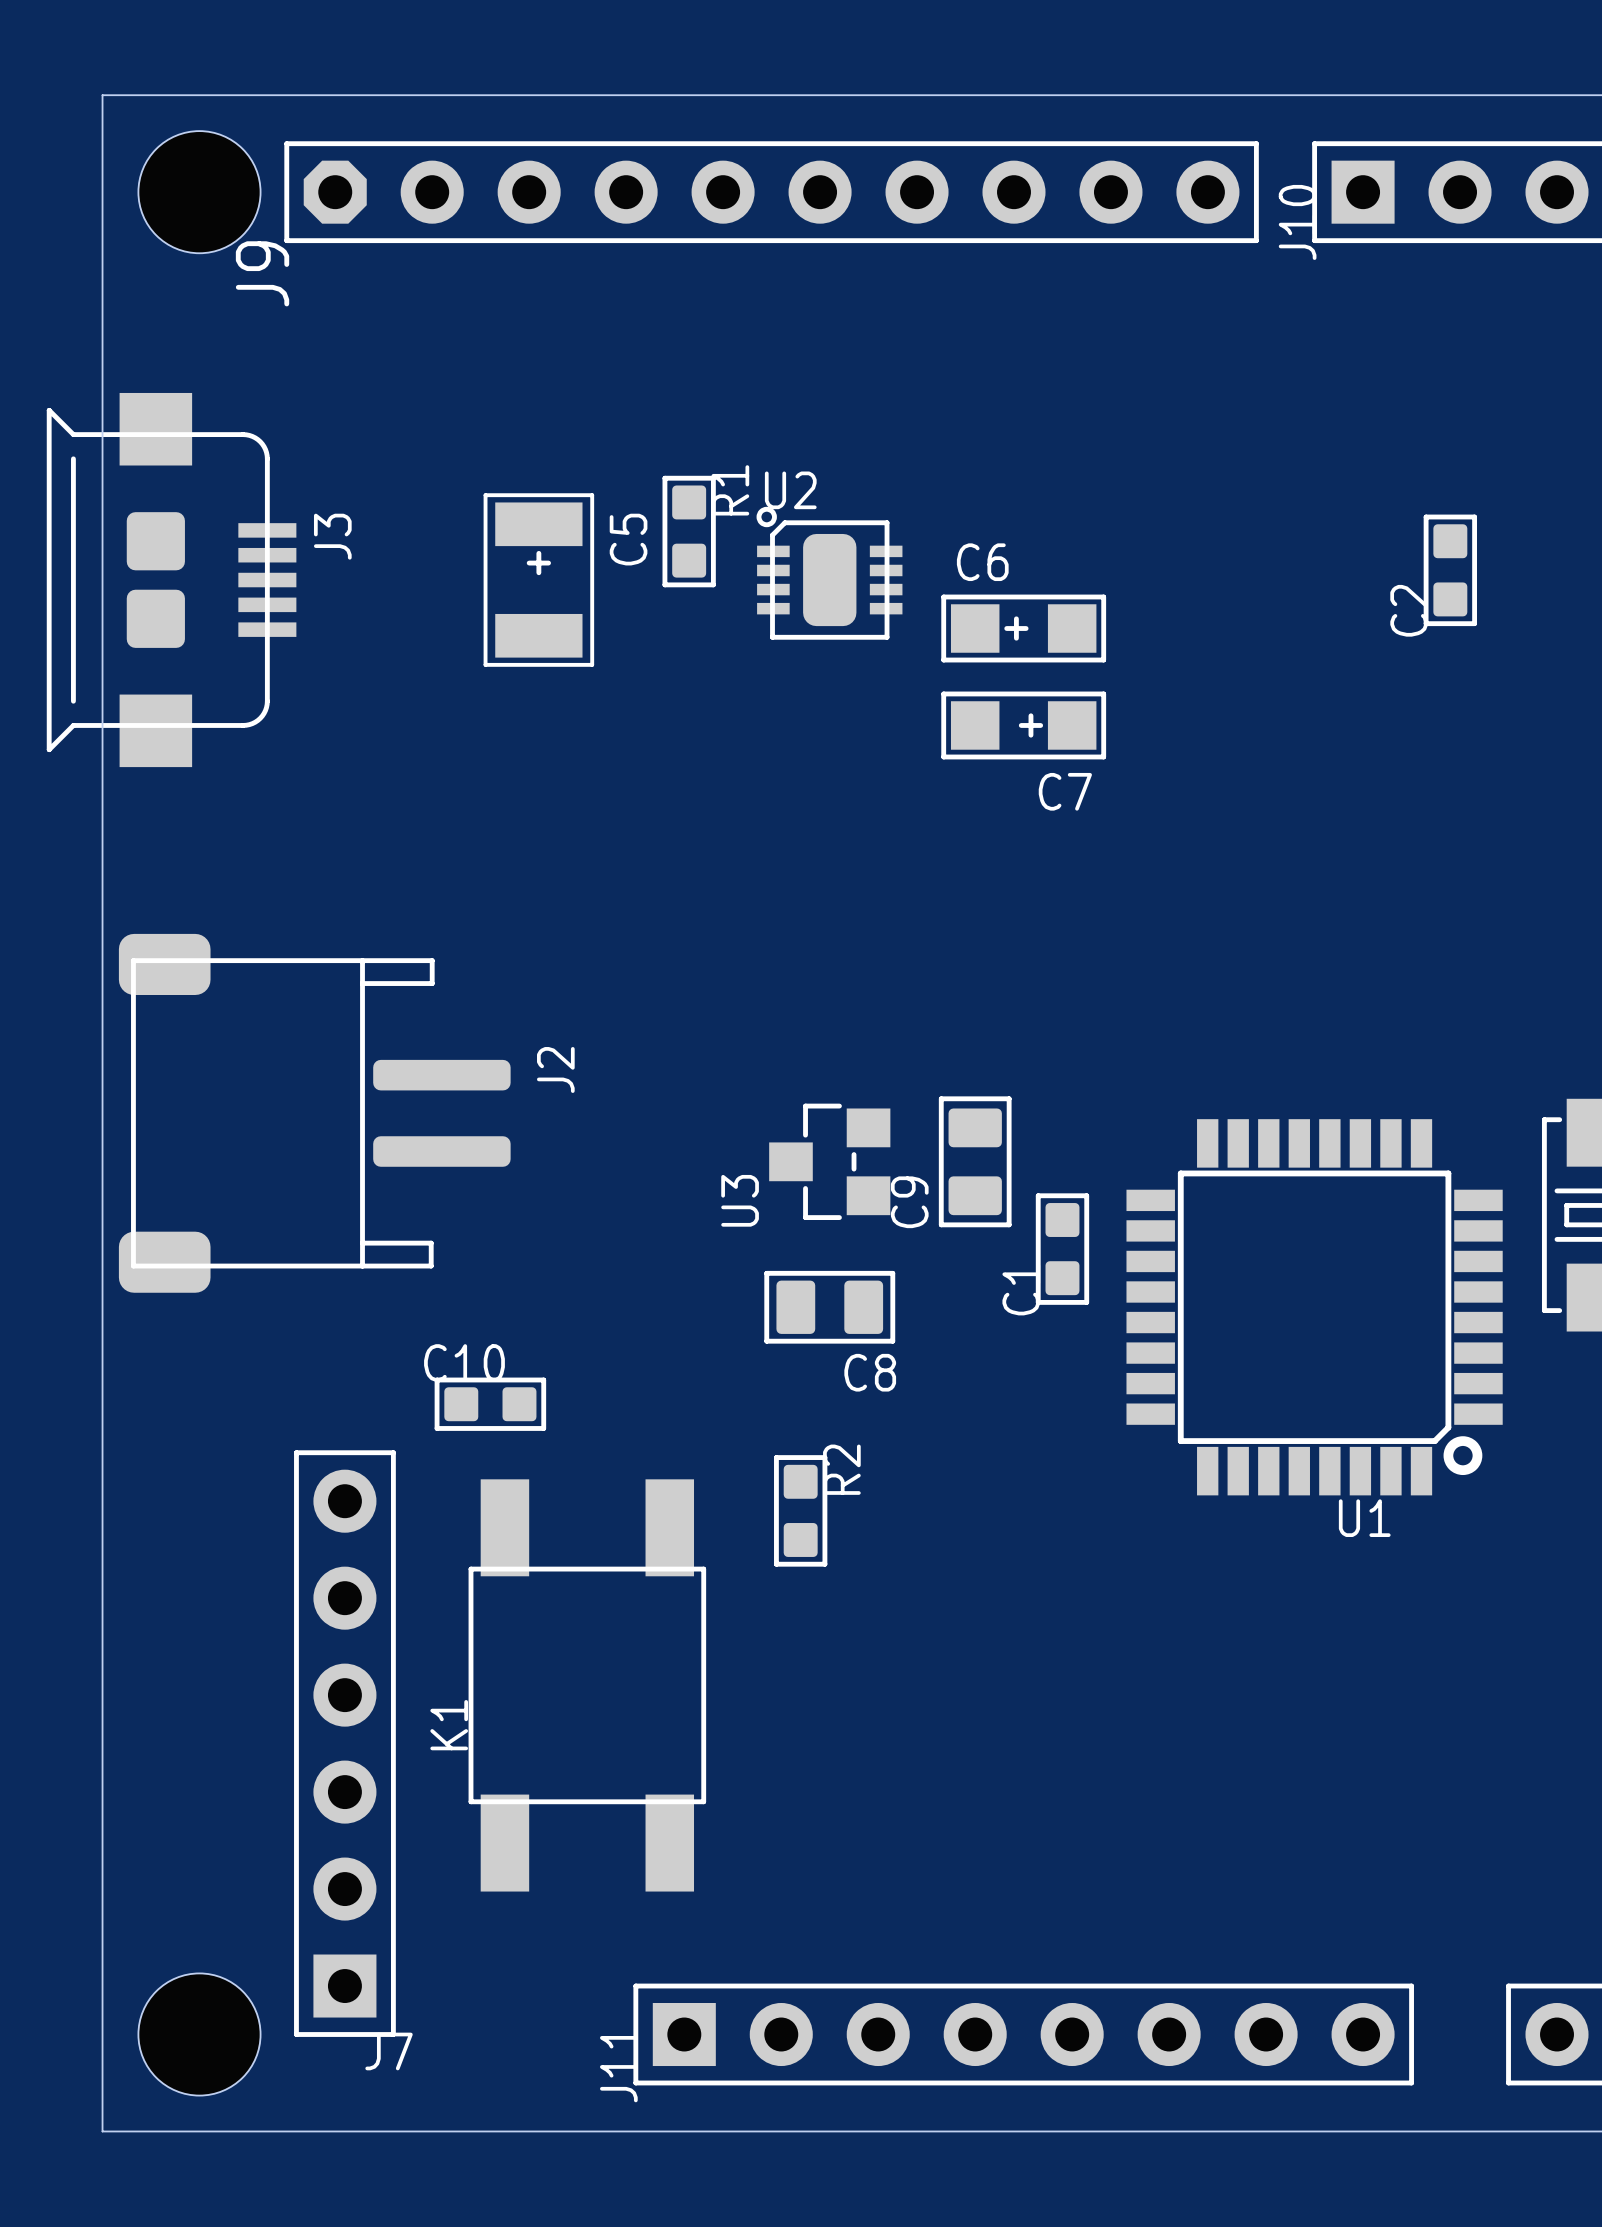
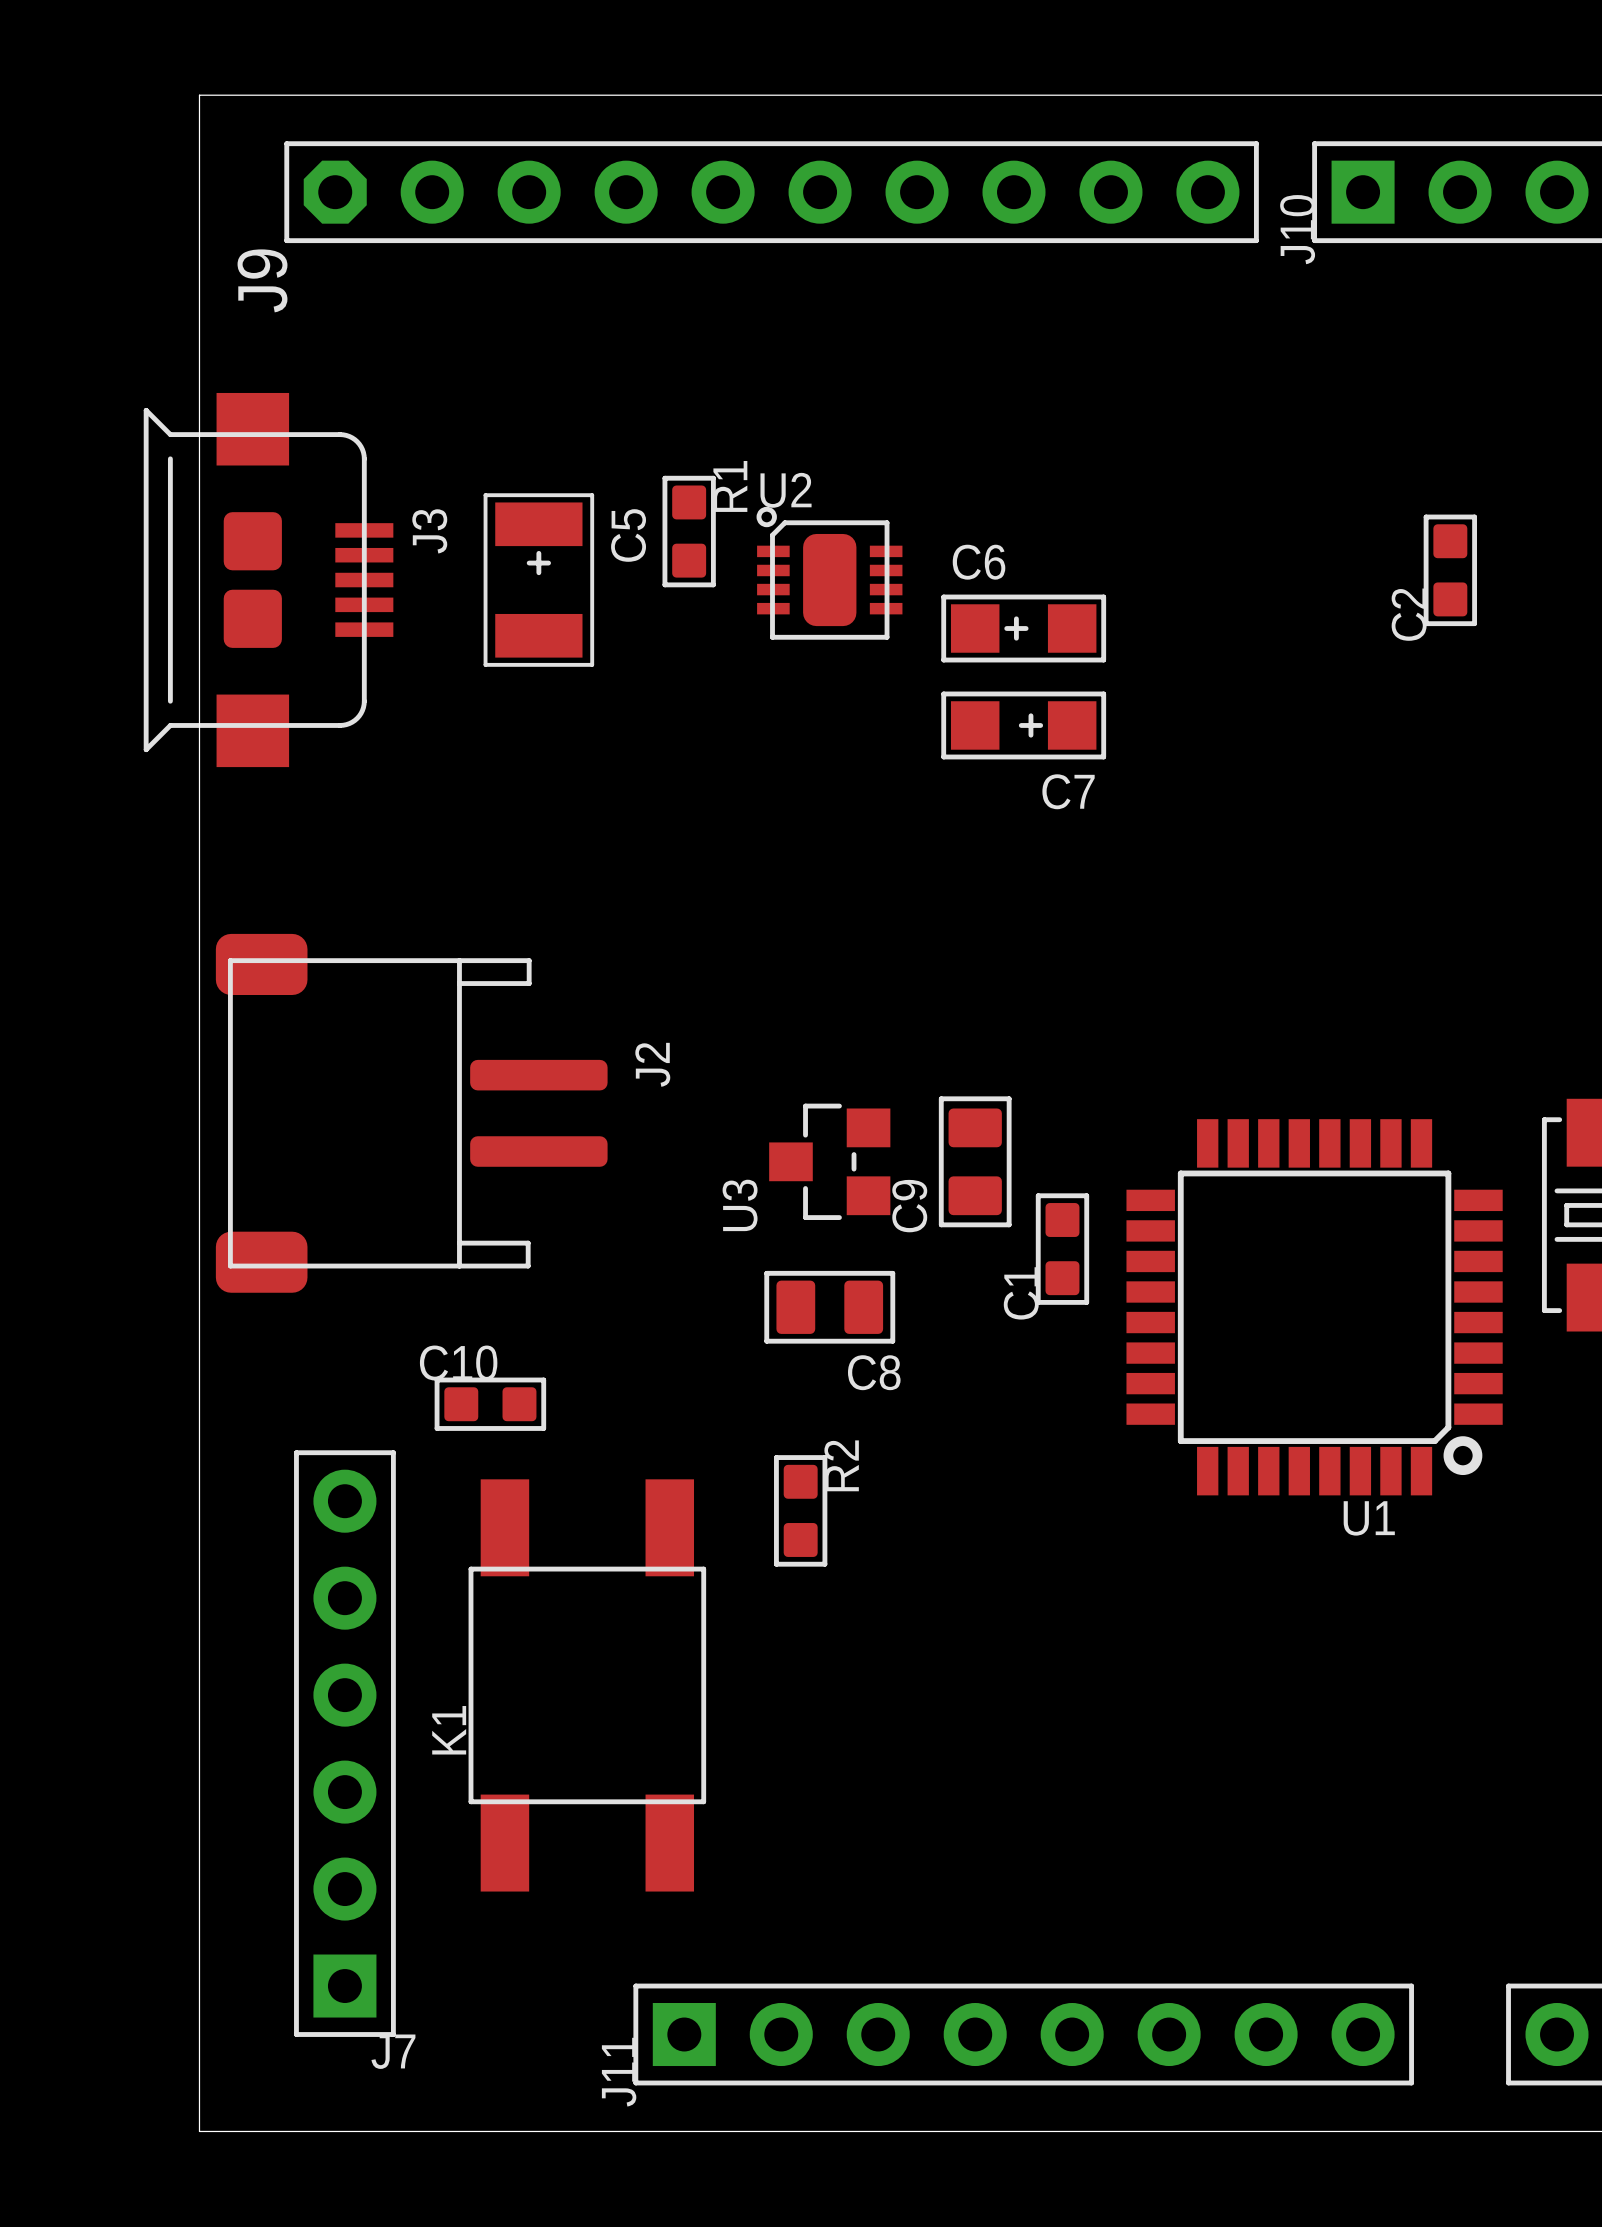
board edge: (199, 95) (102, 95) (102, 2131) (199, 2131) -> (199, 95) (199, 2131)
hole: (199, 192) -> none
J3 position: (171, 580) -> (268, 580)
J2 position: (314, 1113) -> (411, 1113)
hole: (199, 2034) -> none

